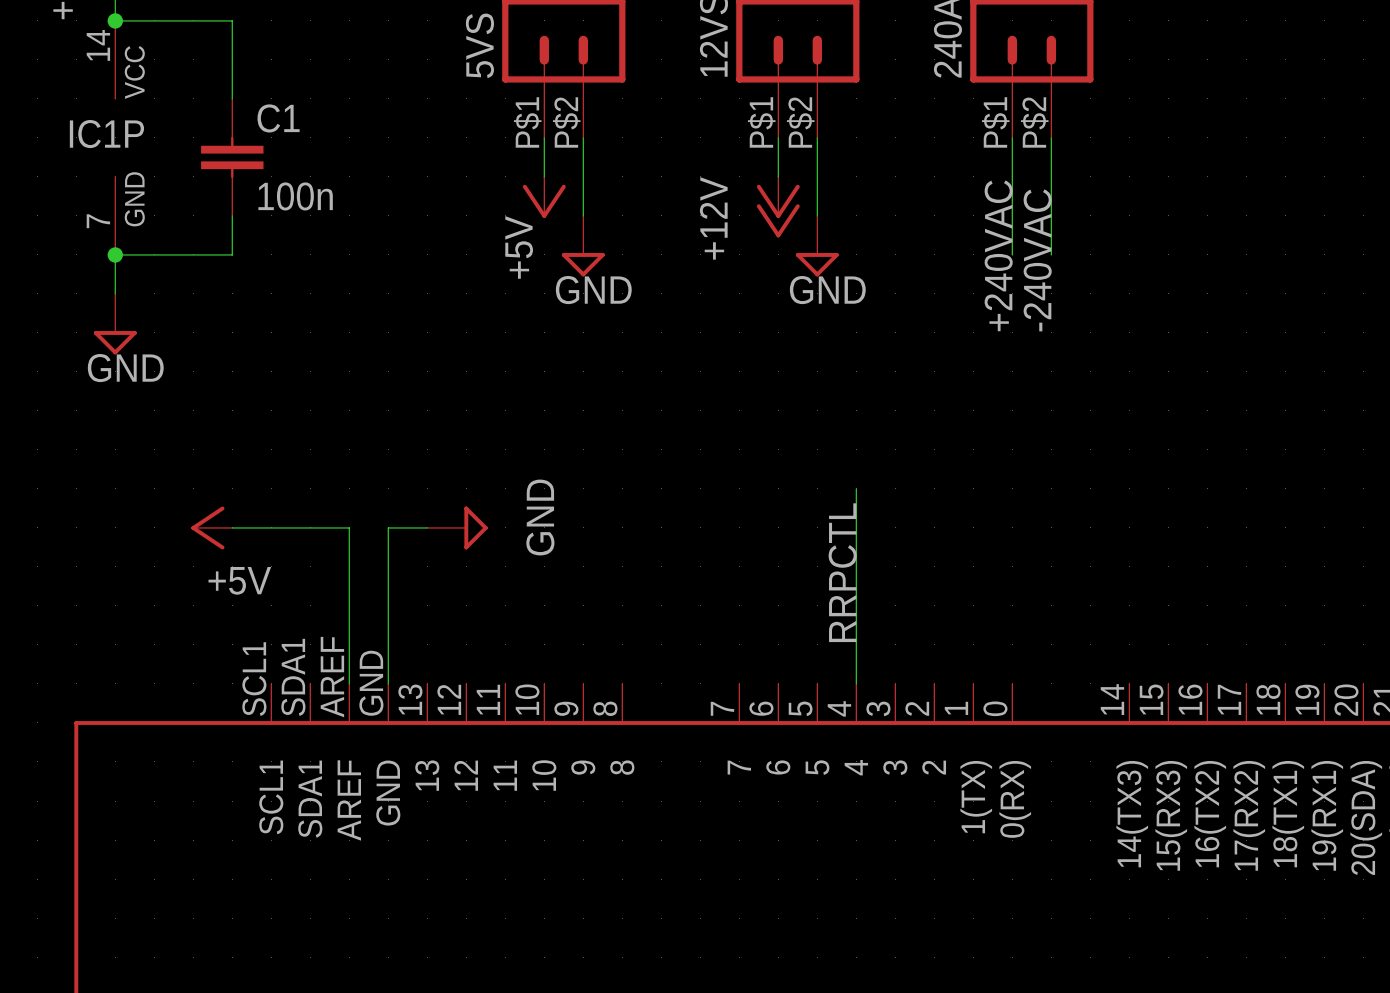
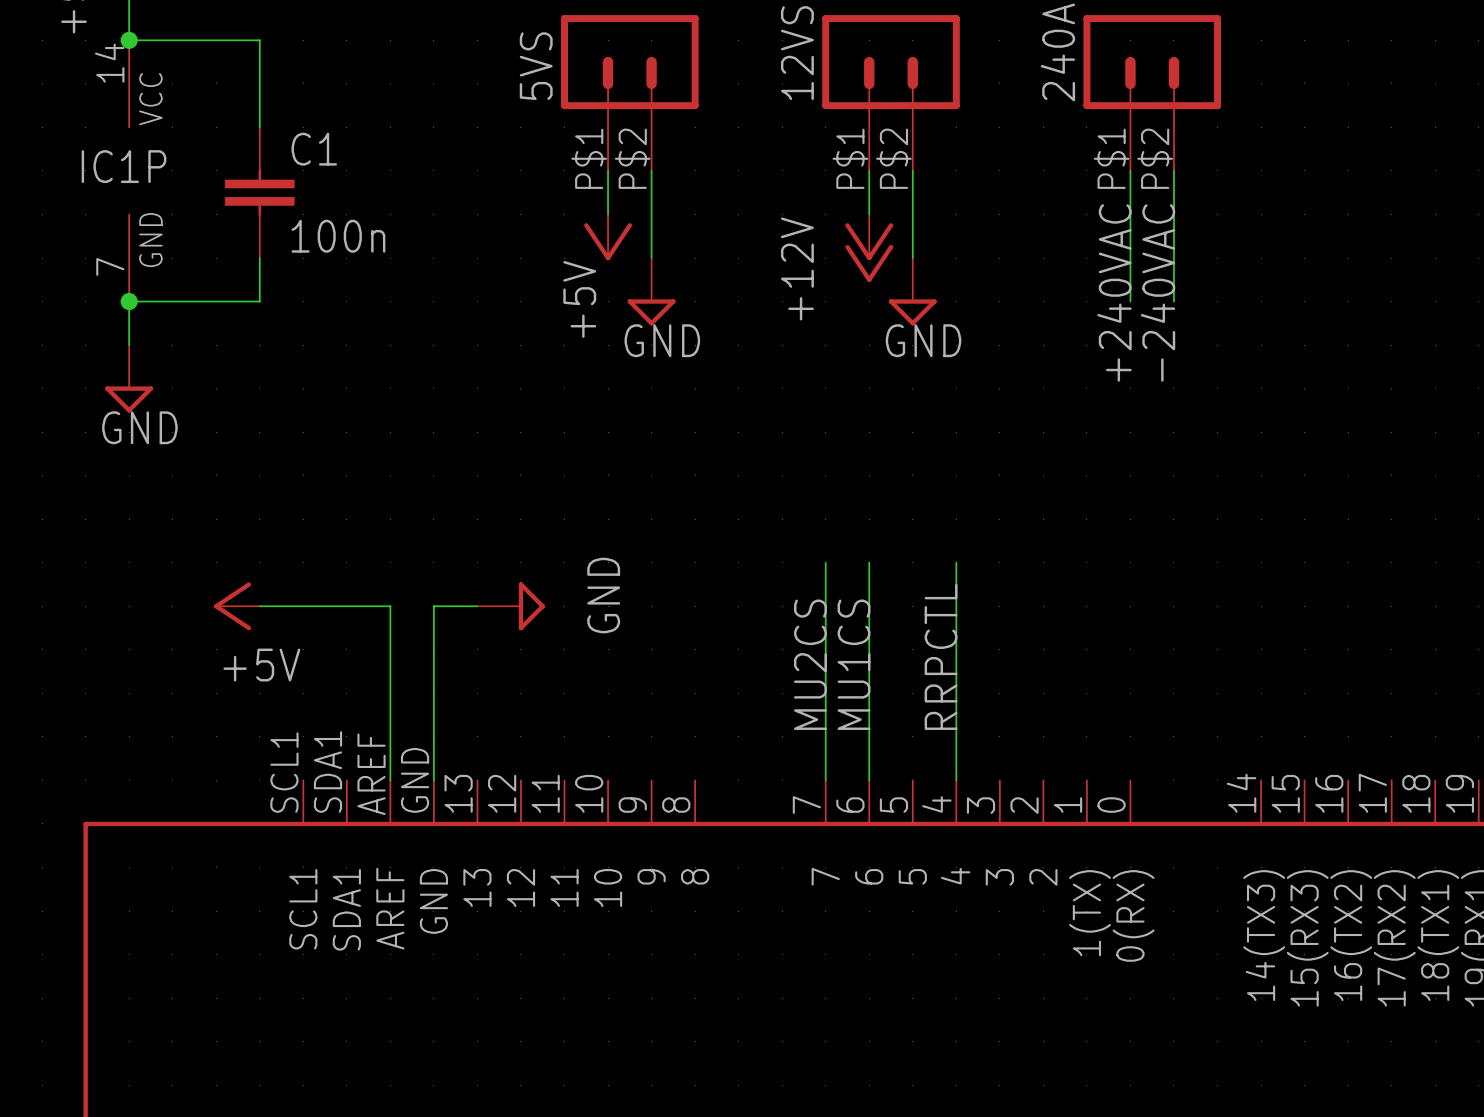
wire: none -> (825, 562) (825, 780)
wire: none -> (869, 562) (869, 780)
label: none -> MU2CS (810, 664)
label: none -> MU1CS (854, 664)

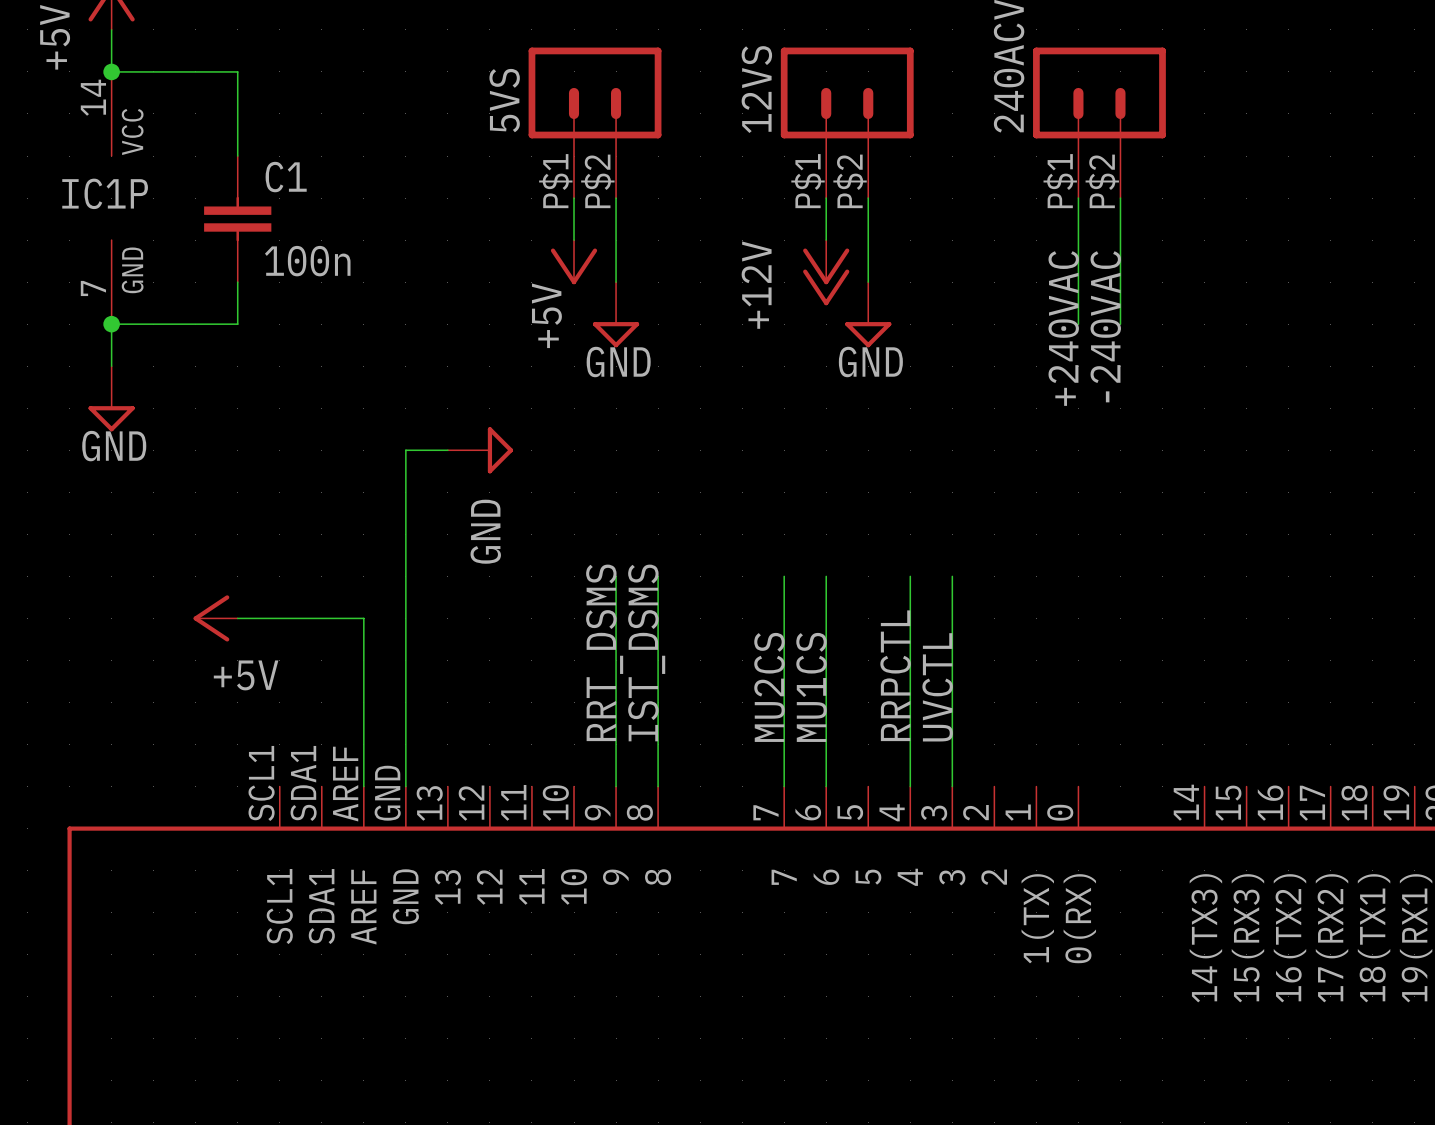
wire: none -> (616, 576) (616, 786)
wire: none -> (658, 576) (658, 786)
wire: none -> (952, 576) (952, 786)
power symbol text position: GND (603, 595) -> GND (485, 531)
wire: (433, 606) (477, 606) -> (405, 618) (405, 450) (447, 450)
power symbol position: GND (511, 606) -> GND (480, 450)
label: none -> RRT_DSMS (604, 652)
label: none -> IST_DSMS (646, 652)
label: none -> UVCTL (937, 687)

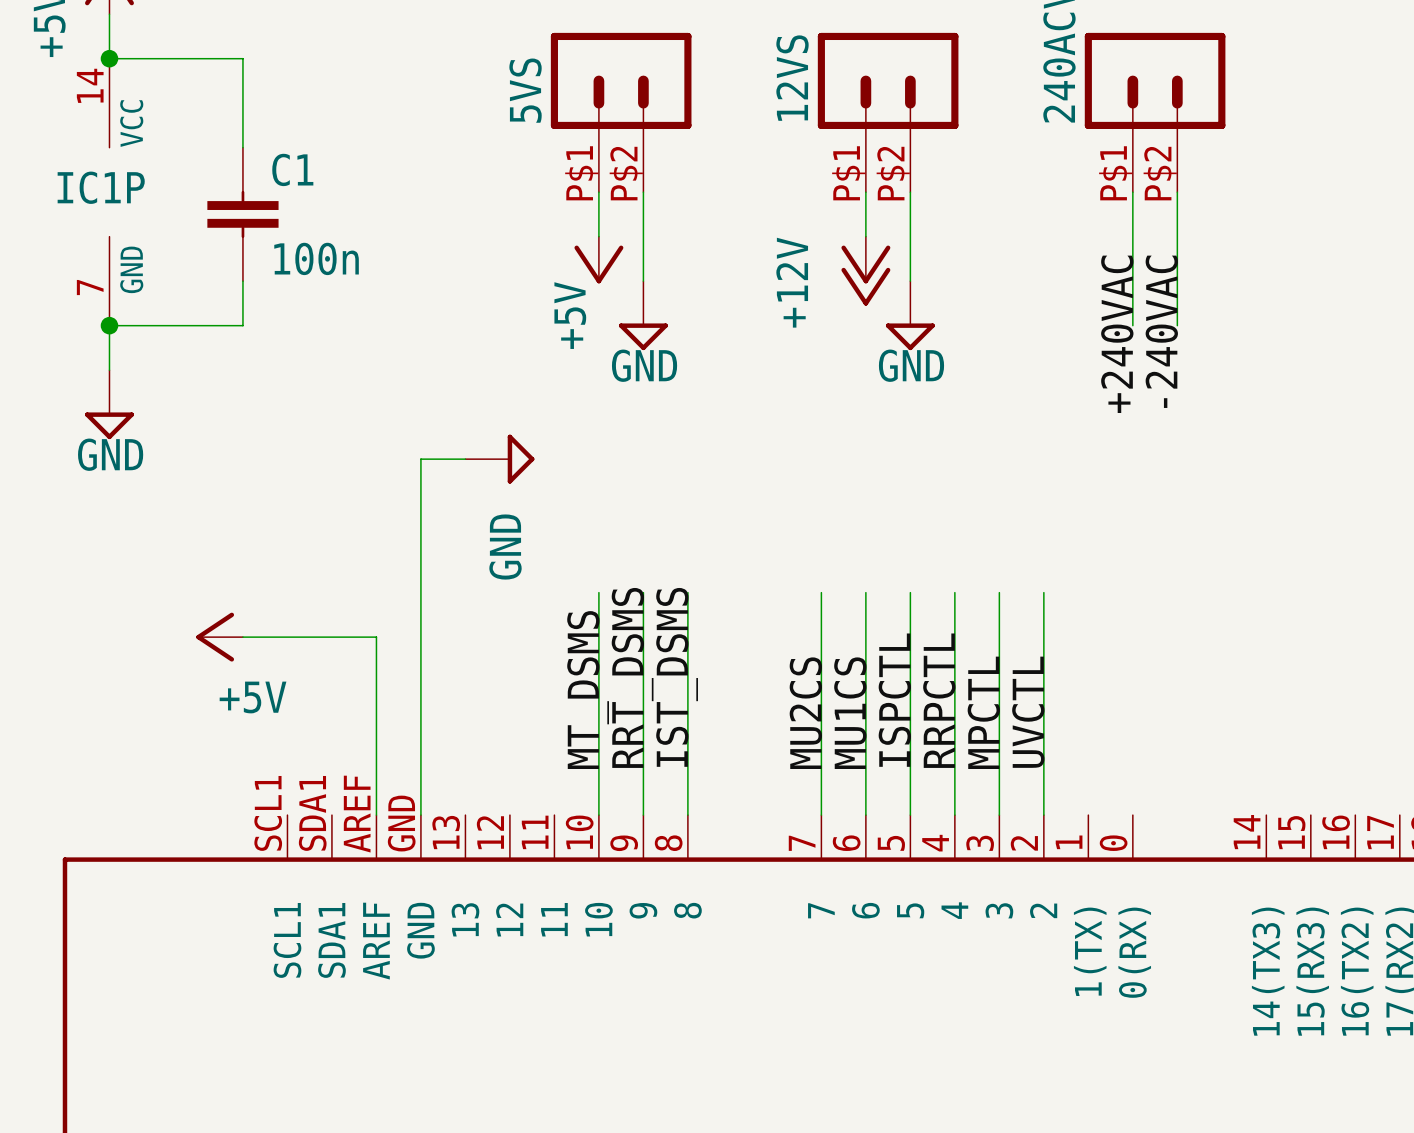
wire: none -> (598, 592) (598, 815)
wire: none -> (910, 592) (910, 815)
wire: none -> (1043, 592) (1043, 815)
label: none -> MT_DSMS (588, 690)
label: none -> ISPCTL (894, 700)
label: UVCTL (937, 687) -> MPCTL (983, 712)
label: none -> UVCTL (1028, 712)

